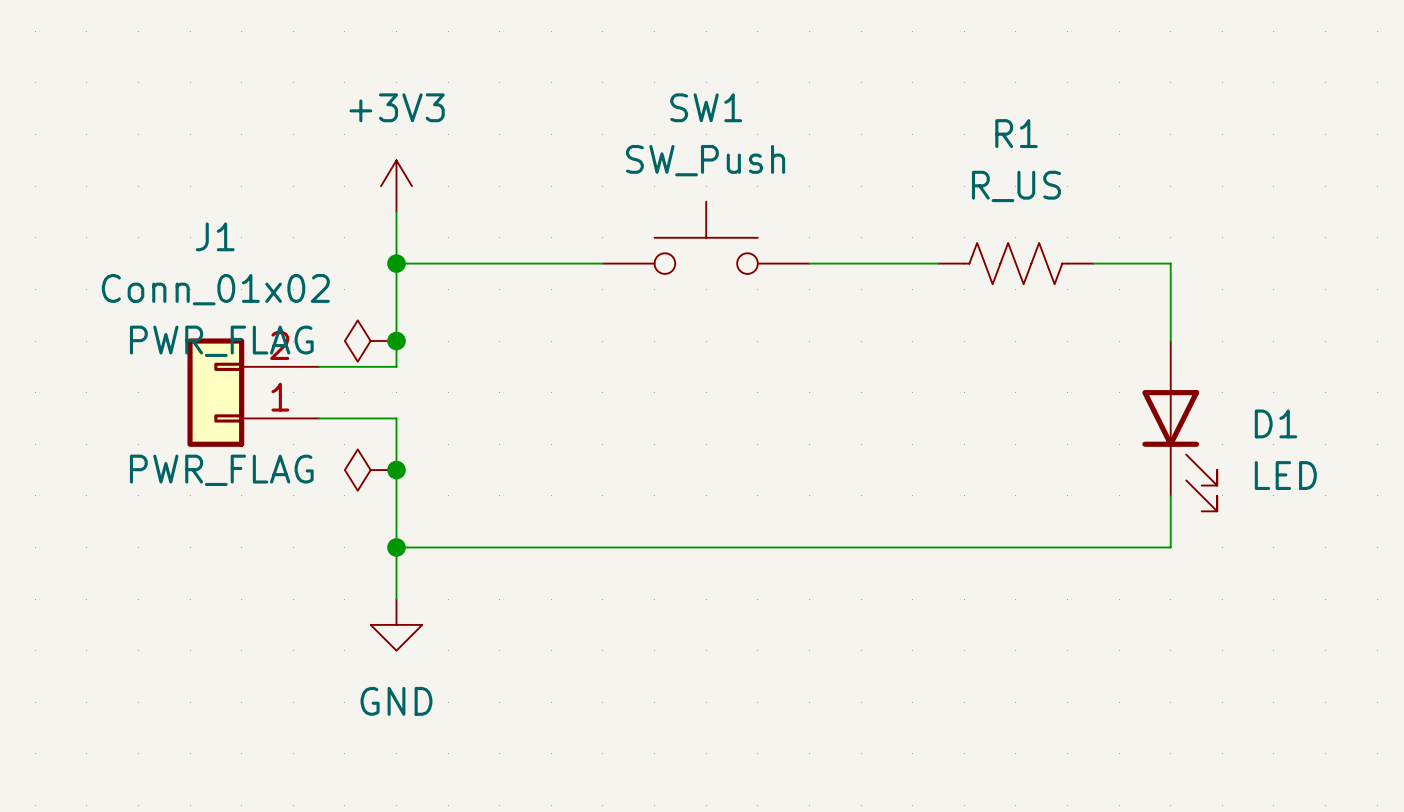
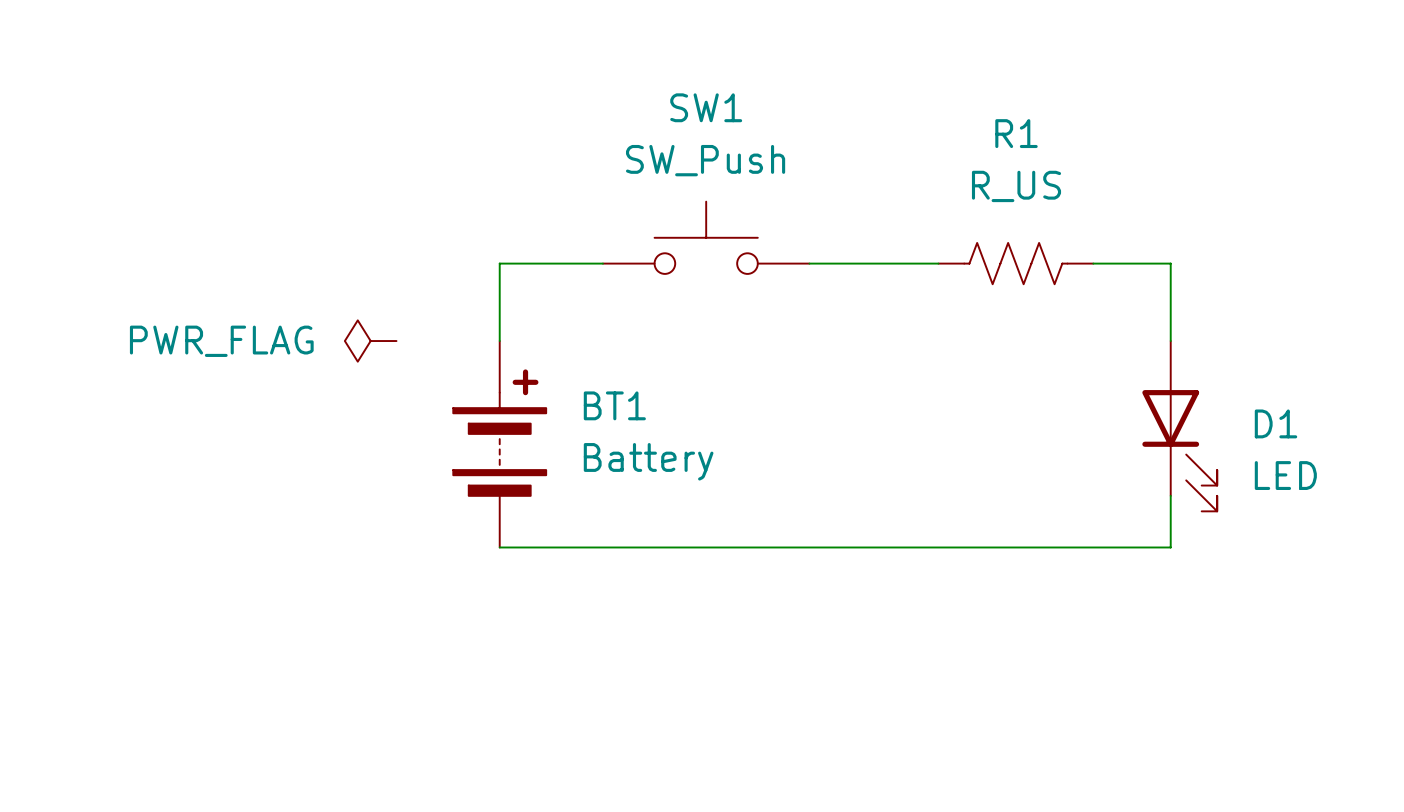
power symbol: +3V3 (396, 186) -> none
wire: (396, 211) (396, 366) (319, 366) -> none
wire: (396, 263) (499, 263) -> (499, 341) (499, 263)
junction: (396, 263) -> none
junction: (396, 341) -> none
J1: Conn_01x02 (253, 392) -> none
wire: (319, 418) (396, 418) (396, 599) -> none
BT1: none -> Battery (499, 444)
power symbol: PWR_FLAG (370, 470) -> none
junction: (396, 470) -> none
wire: (396, 547) (499, 547) -> none
junction: (396, 547) -> none
power symbol: GND (396, 624) -> none

